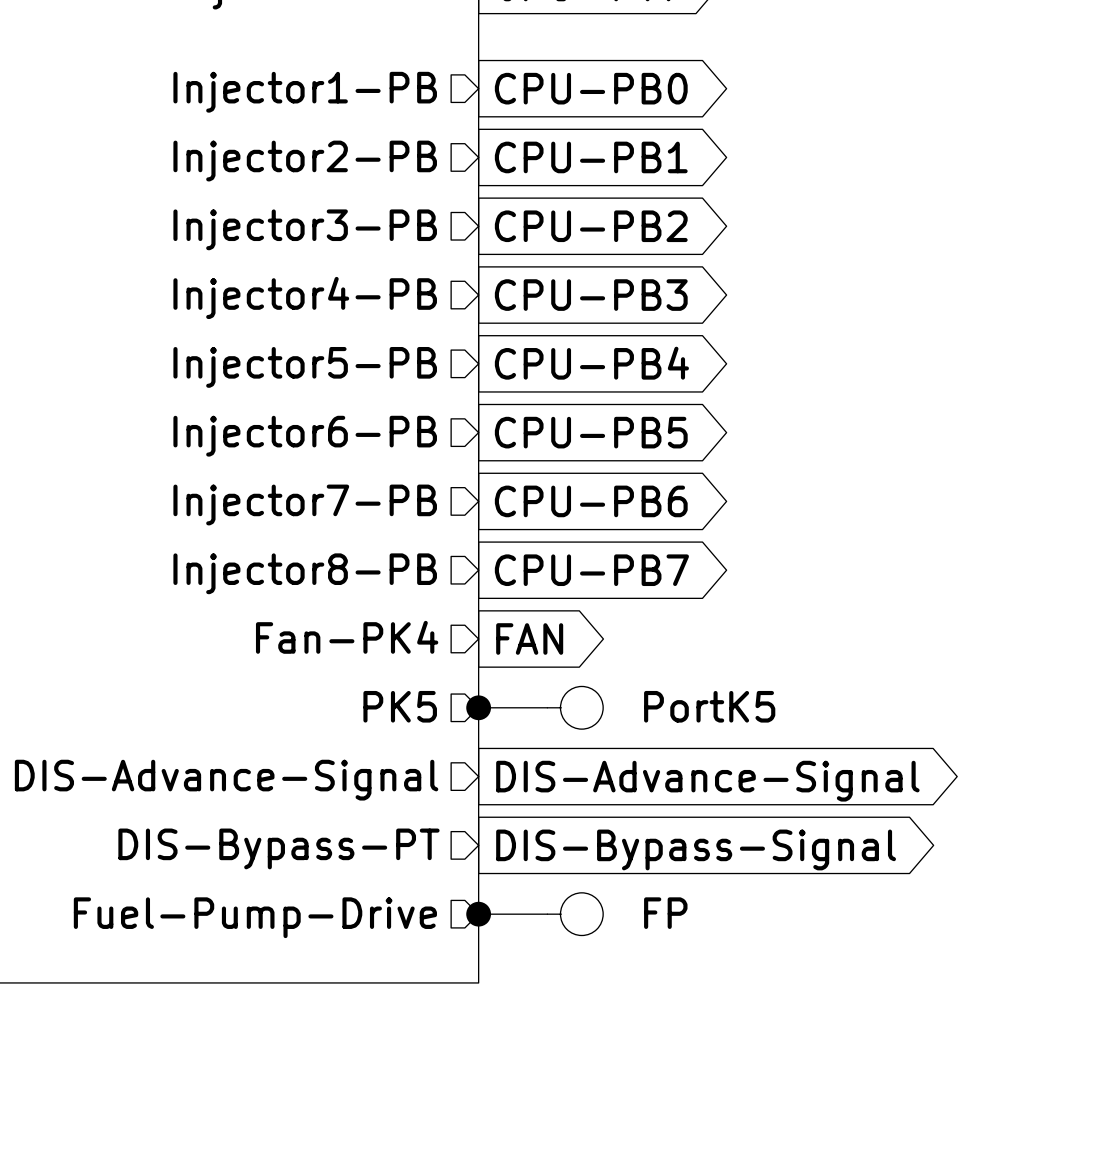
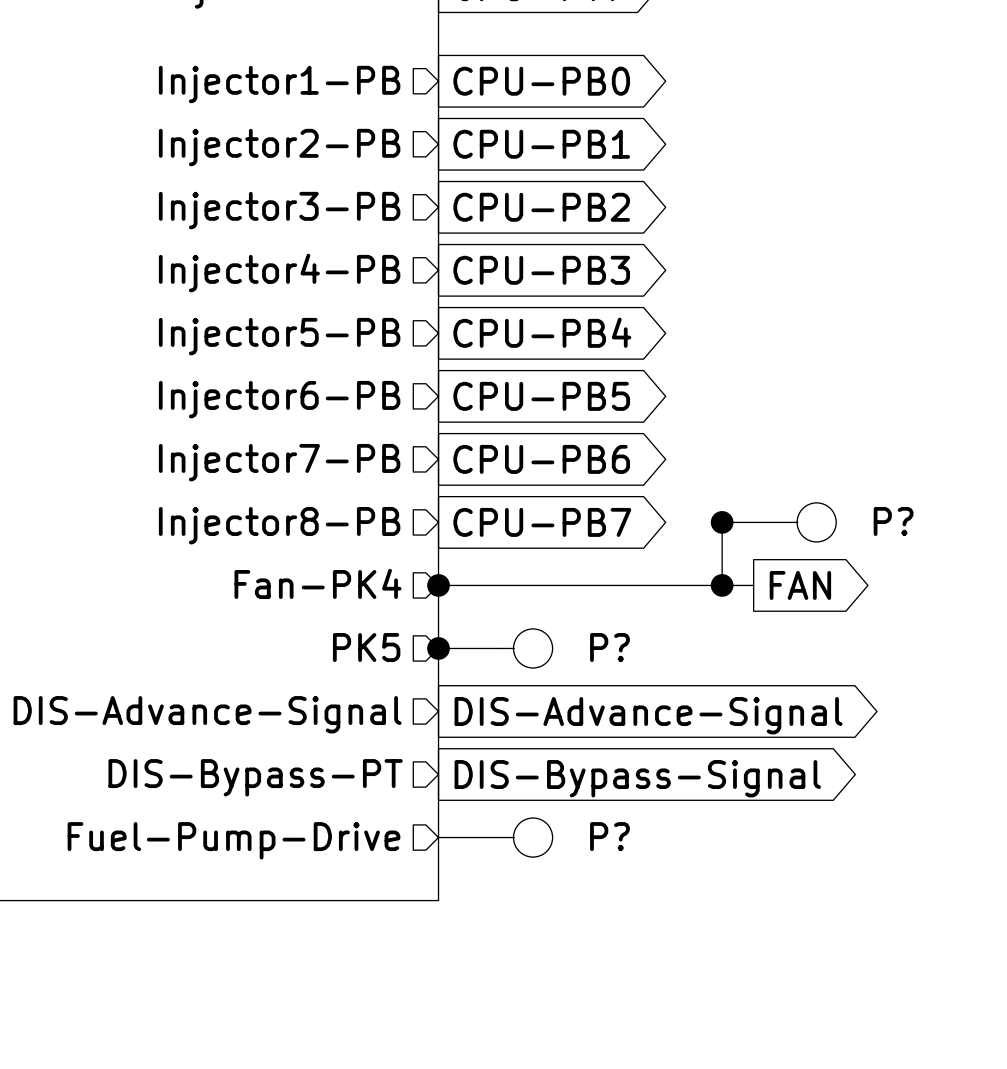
wire: none -> (722, 522) (722, 585)
junction: none -> (722, 522)
P?: none -> (779, 522)
wire: none -> (438, 585) (753, 585)
junction: none -> (438, 585)
global label position: FAN (529, 639) -> FAN (800, 585)
junction: none -> (722, 585)
PortK5 name: PortK5 (709, 706) -> P? (609, 647)
FP name: FP (665, 913) -> P? (609, 836)
junction: (478, 914) -> none

